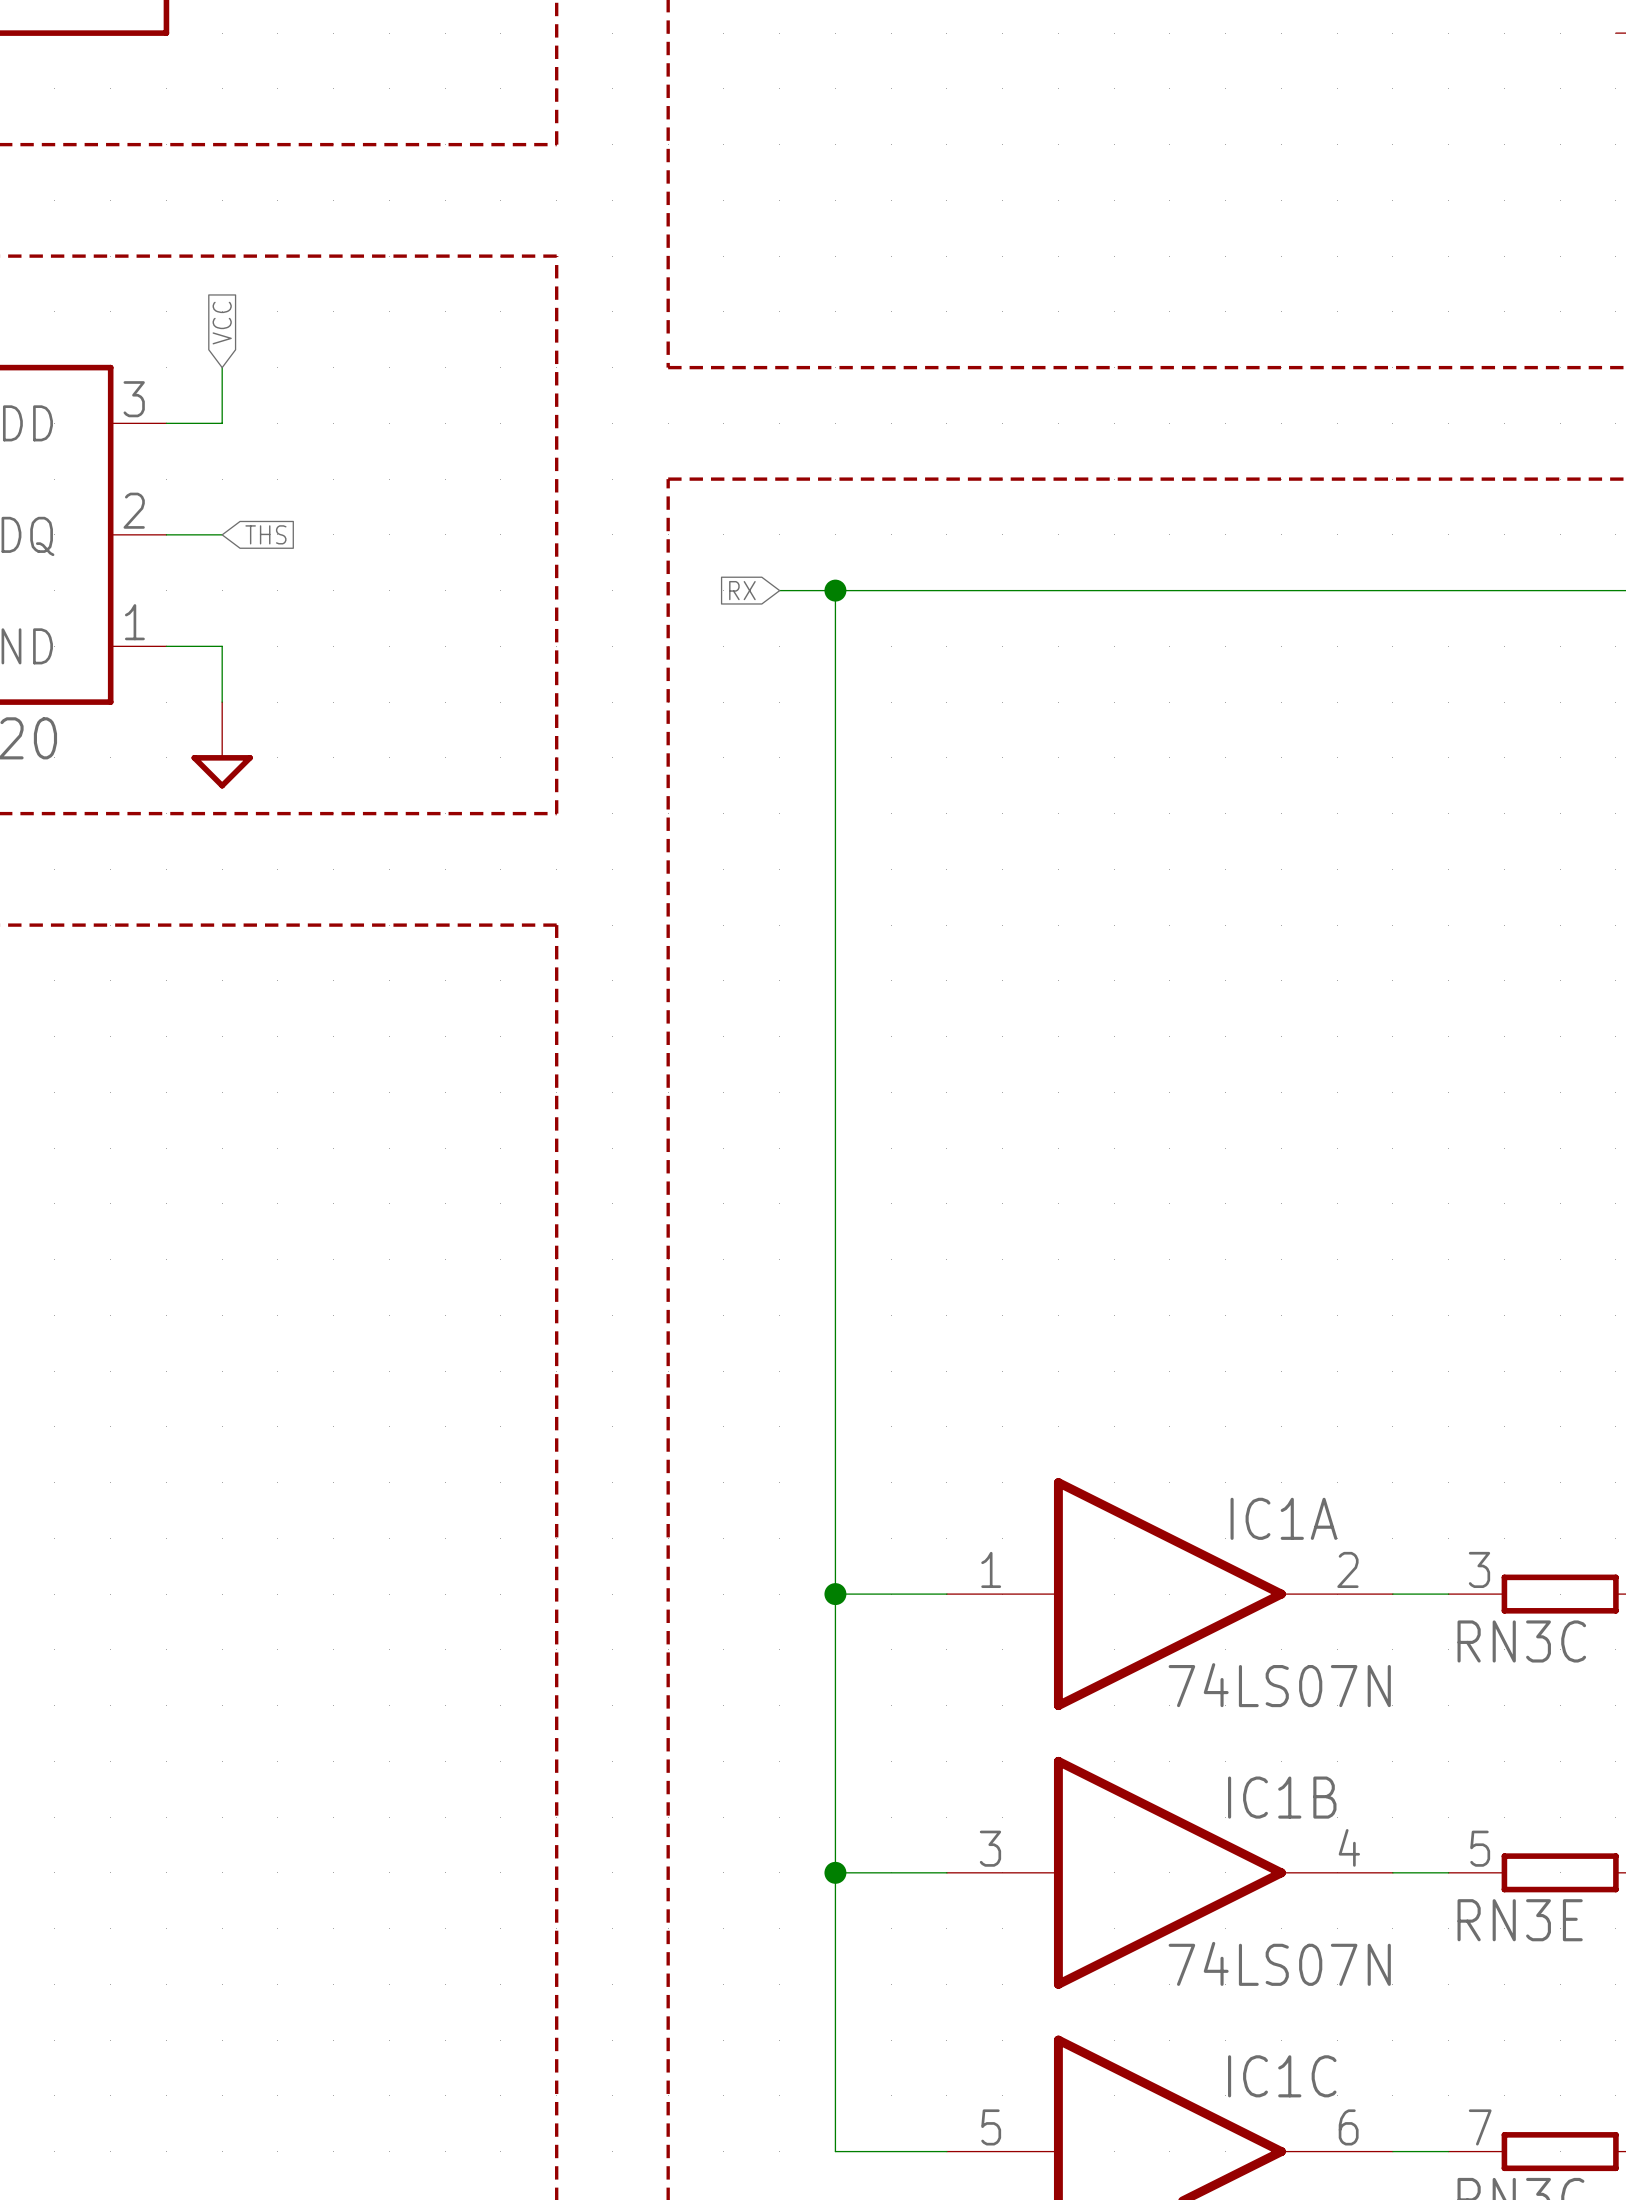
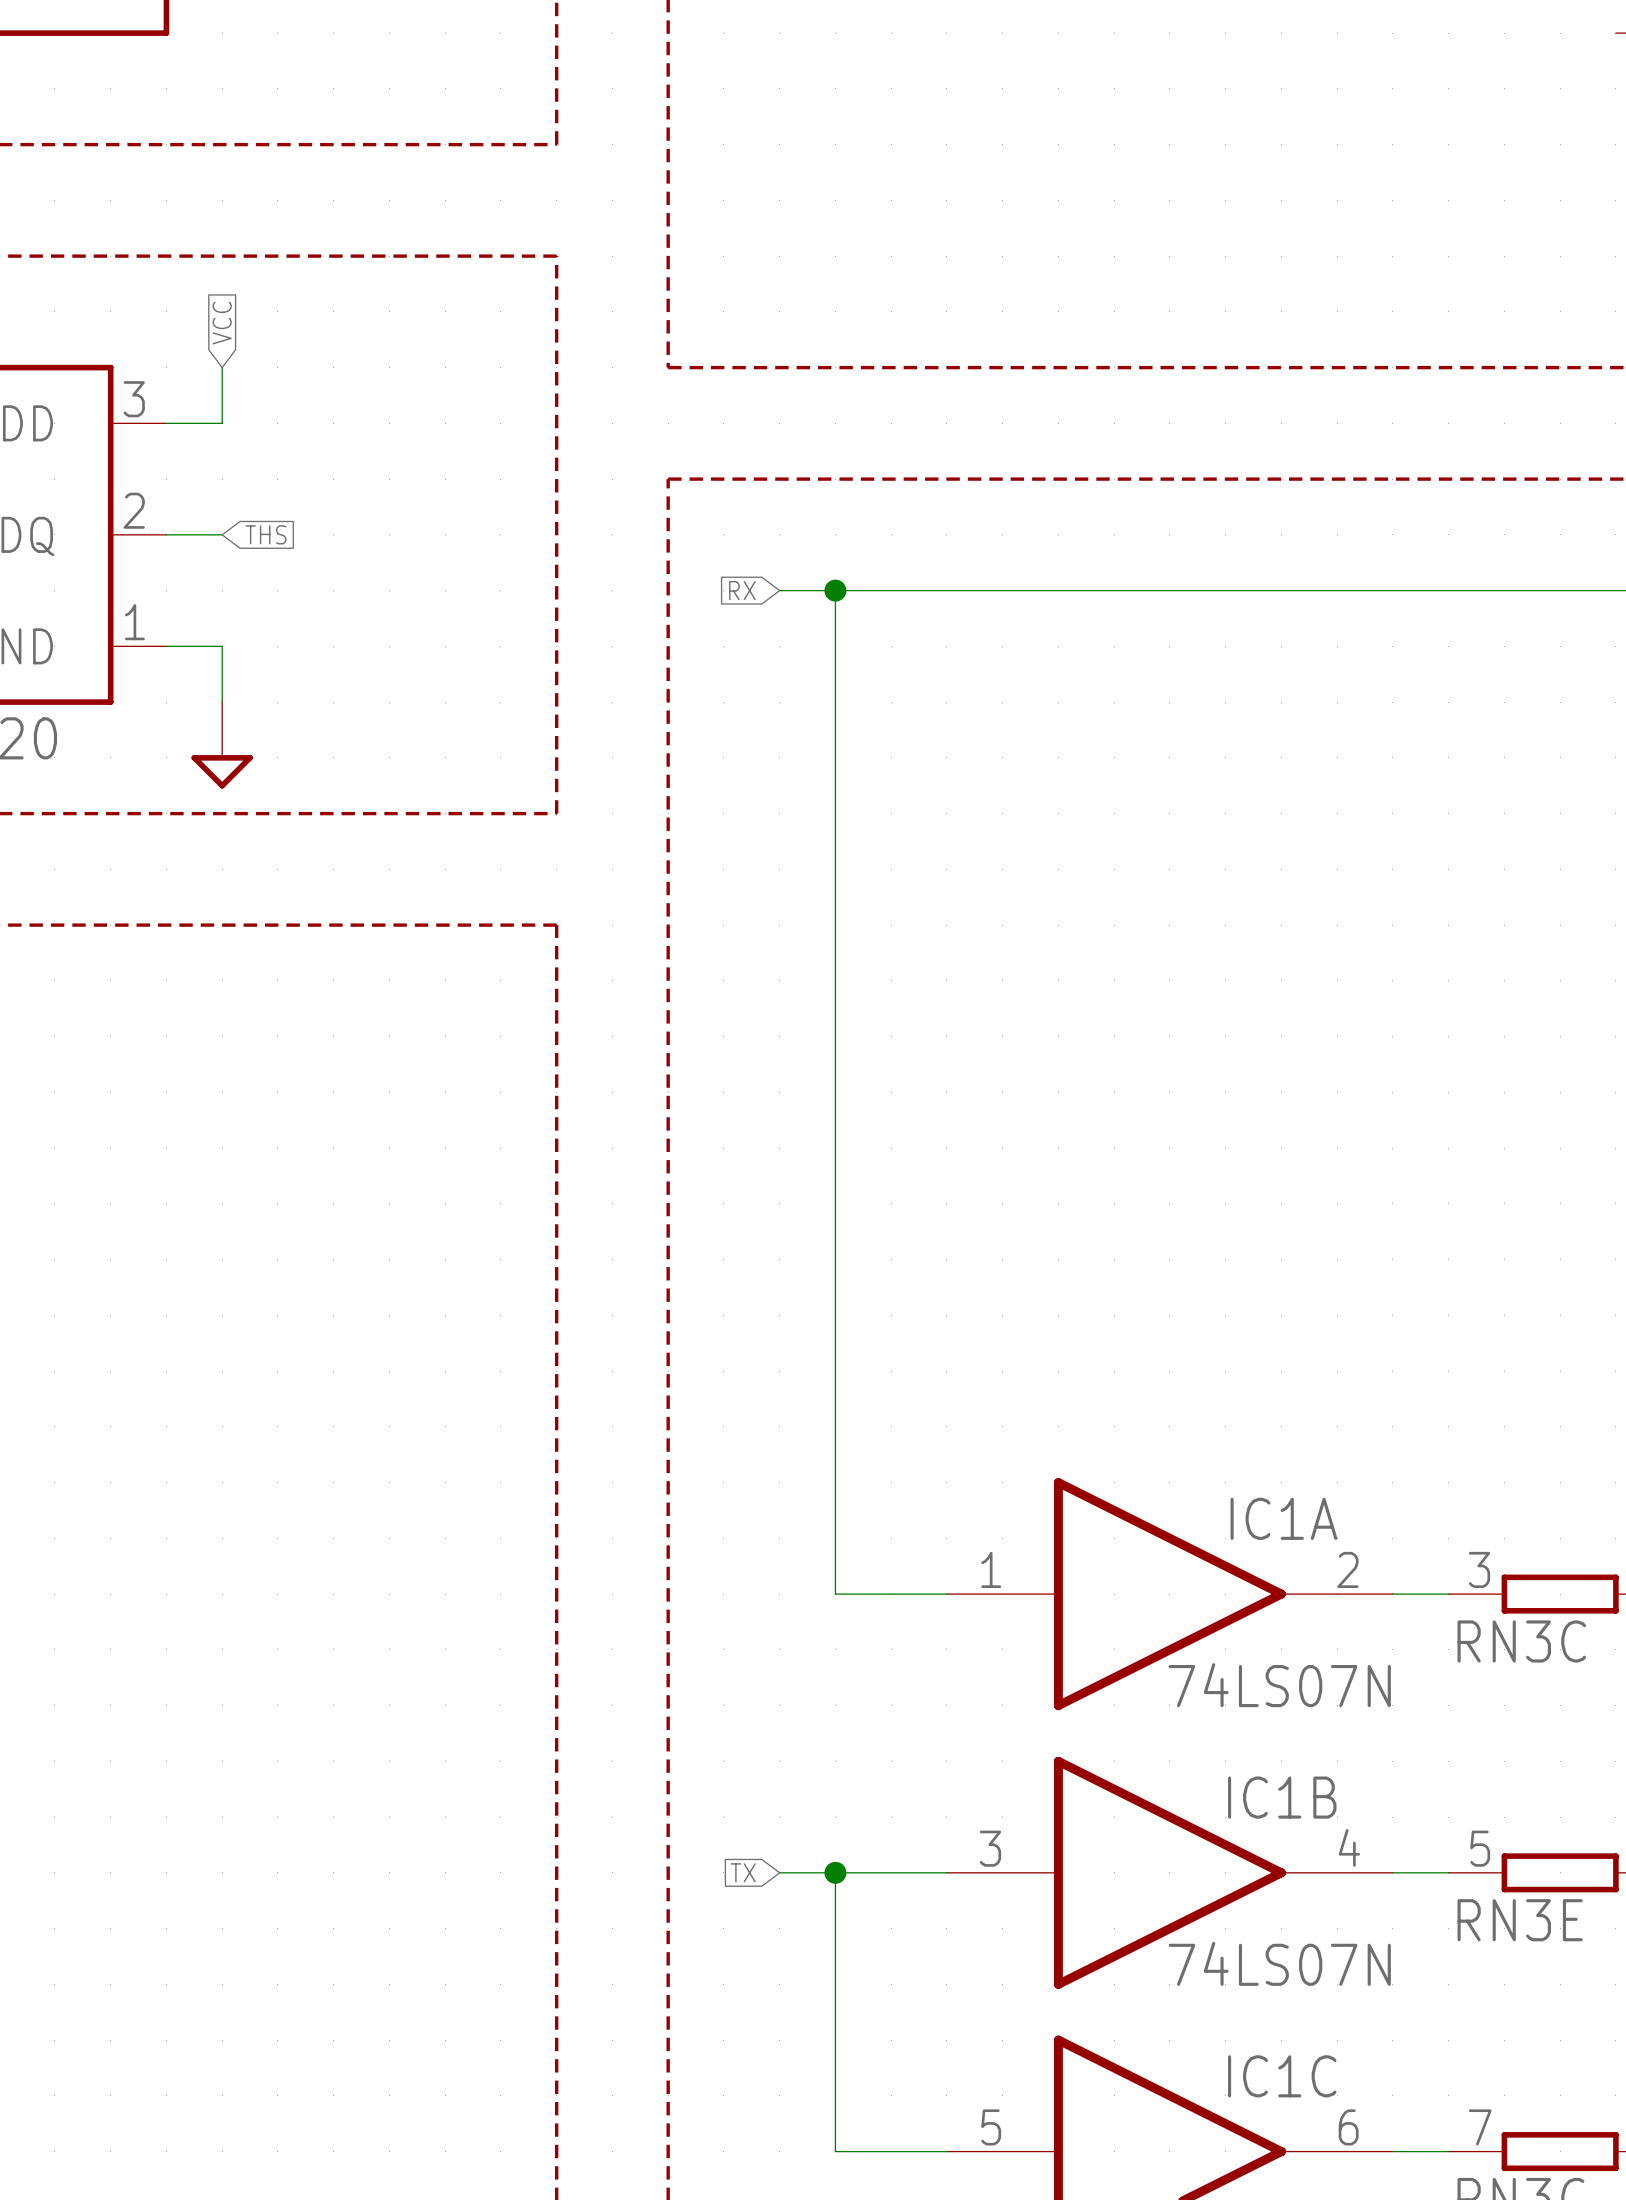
wire: (835, 1594) (835, 1872) -> (779, 1872) (835, 1872)
junction: (835, 1594) -> none
global label: none -> TX (743, 1872)

